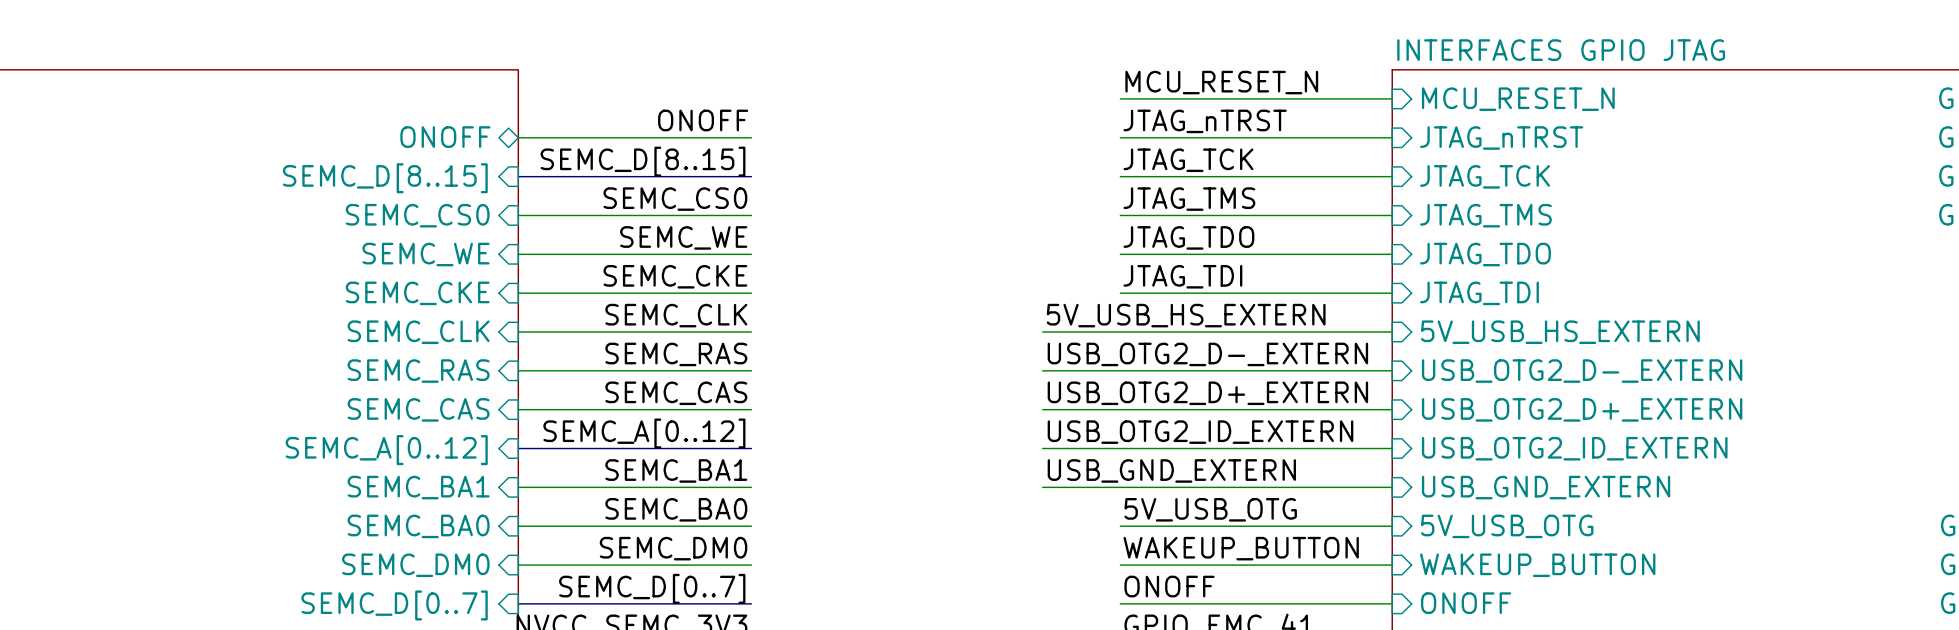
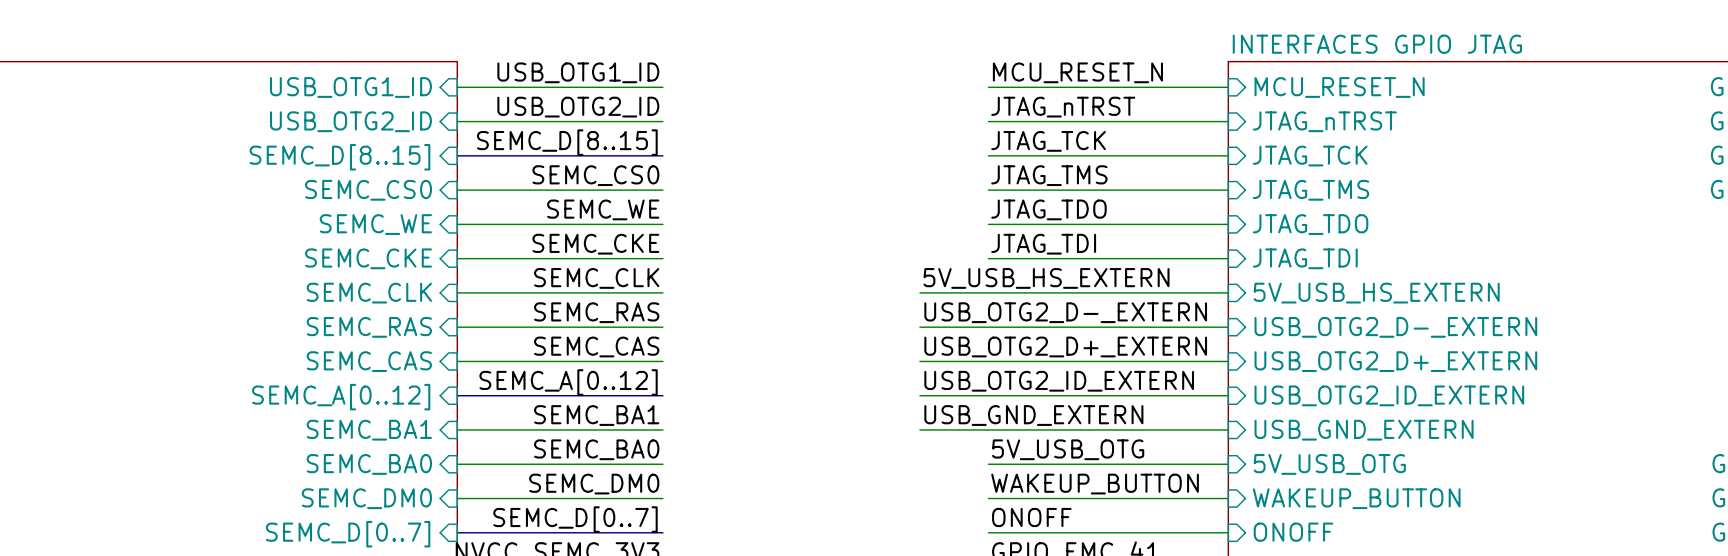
label: none -> USB_OTG1_ID (578, 72)
wire: none -> (457, 87) (662, 87)
sheet pin: none -> USB_OTG1_ID (350, 87)
label: ONOFF (703, 120) -> USB_OTG2_ID (578, 107)
sheet pin shape: bidirectional (445, 137) -> input (350, 121)
sheet pin: ONOFF (445, 137) -> USB_OTG2_ID (350, 121)

